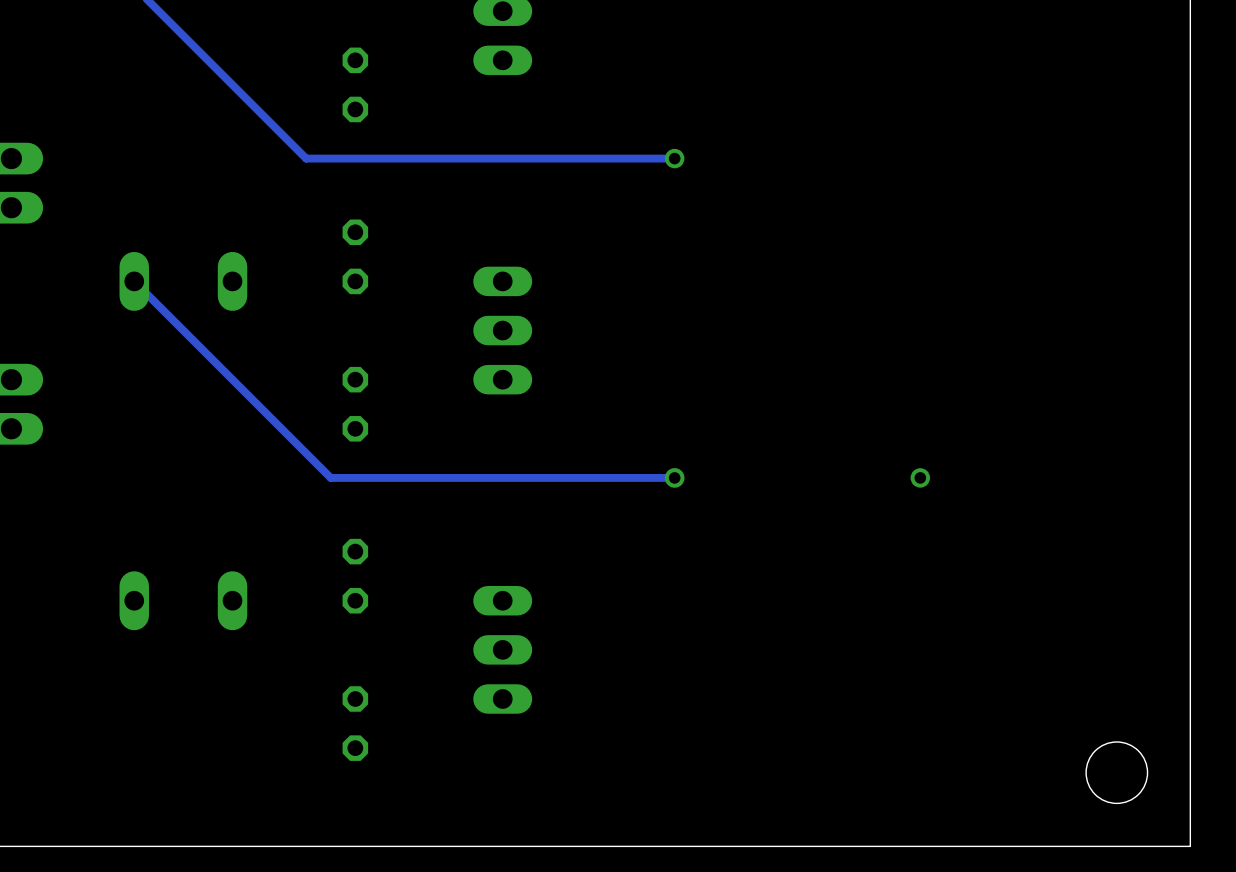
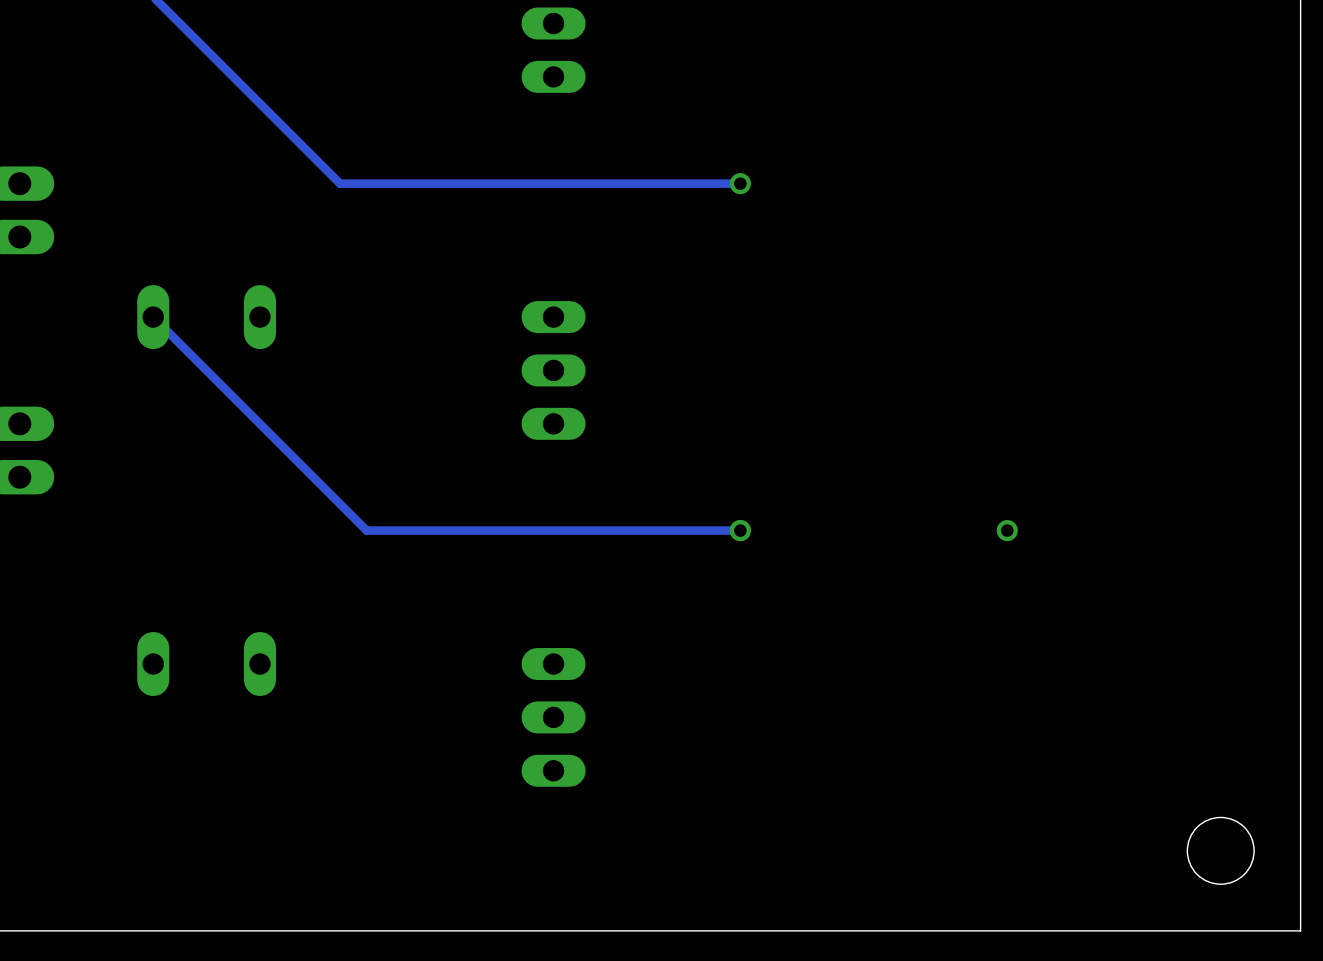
part: (355, 84) -> none
part: (355, 256) -> none
part: (355, 404) -> none
part: (355, 576) -> none
part: (355, 723) -> none

